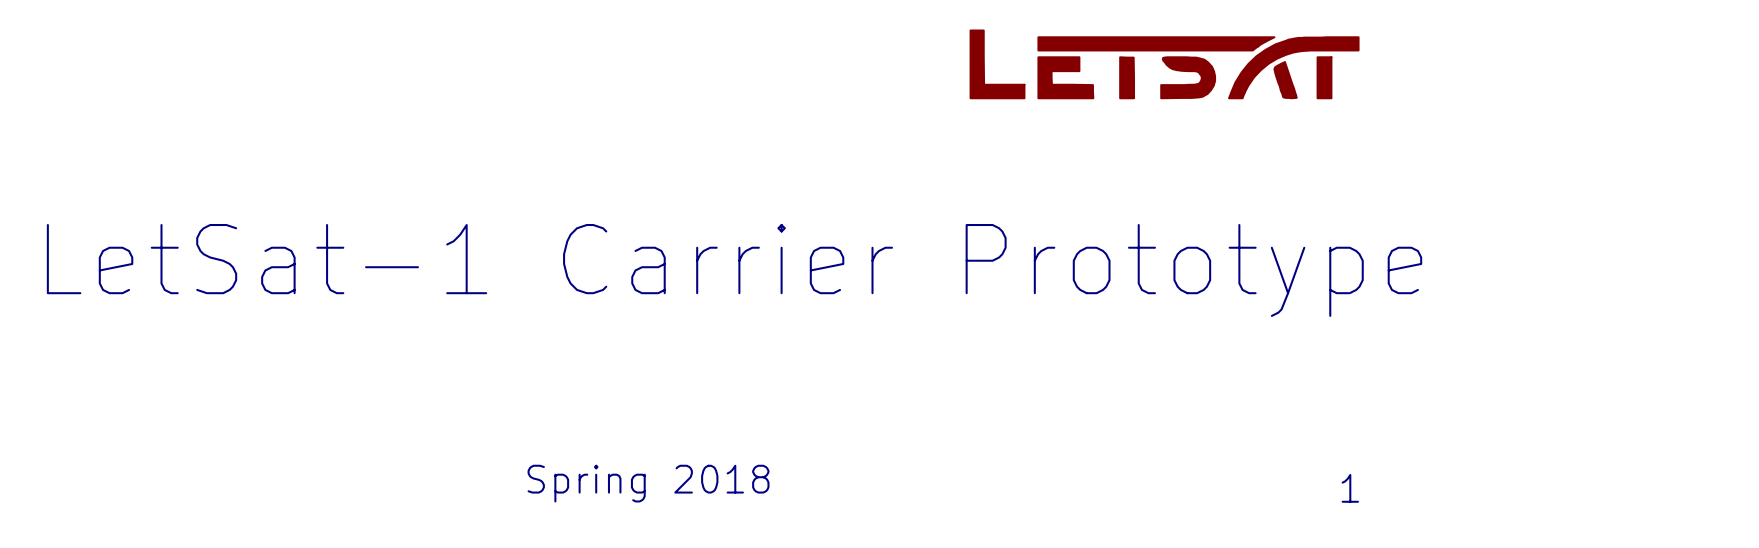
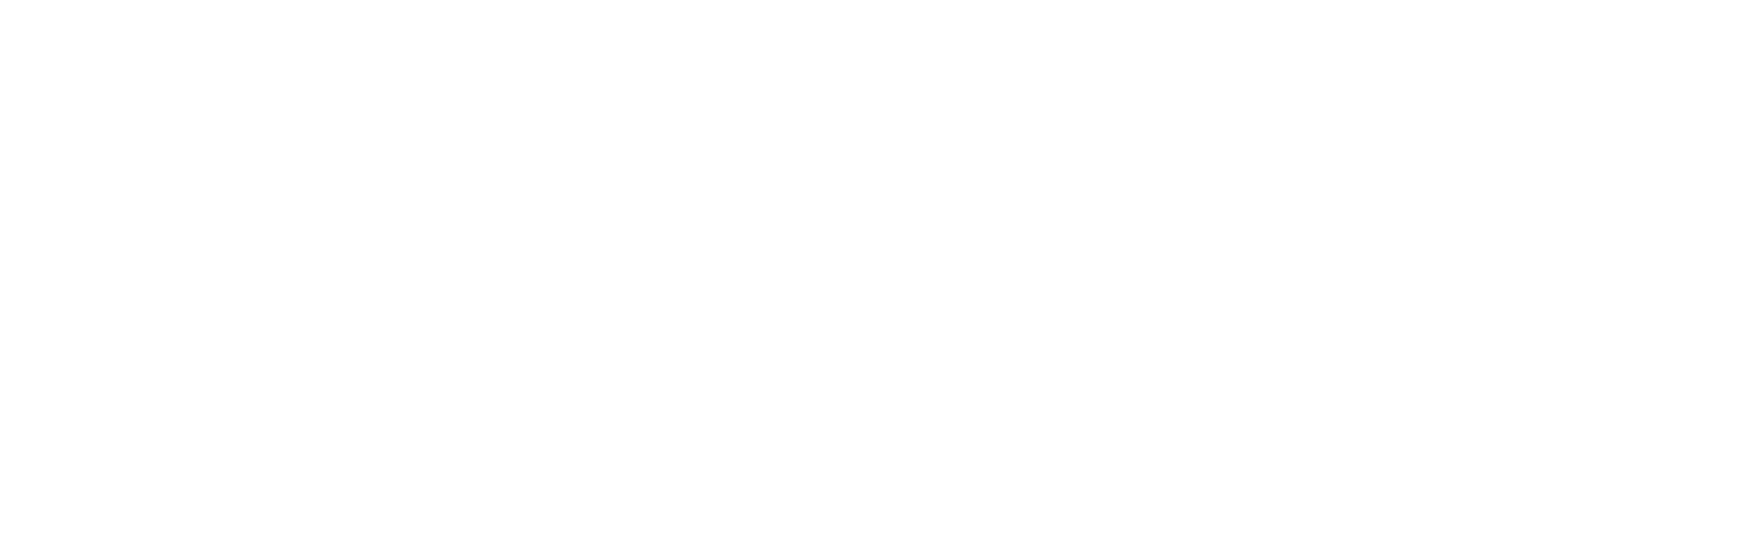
part: (1164, 64) -> none
text: LetSat-1 Carrier Prototype (734, 270) -> none
text: Spring 2018 (648, 483) -> none
text: 1 (1350, 488) -> none

